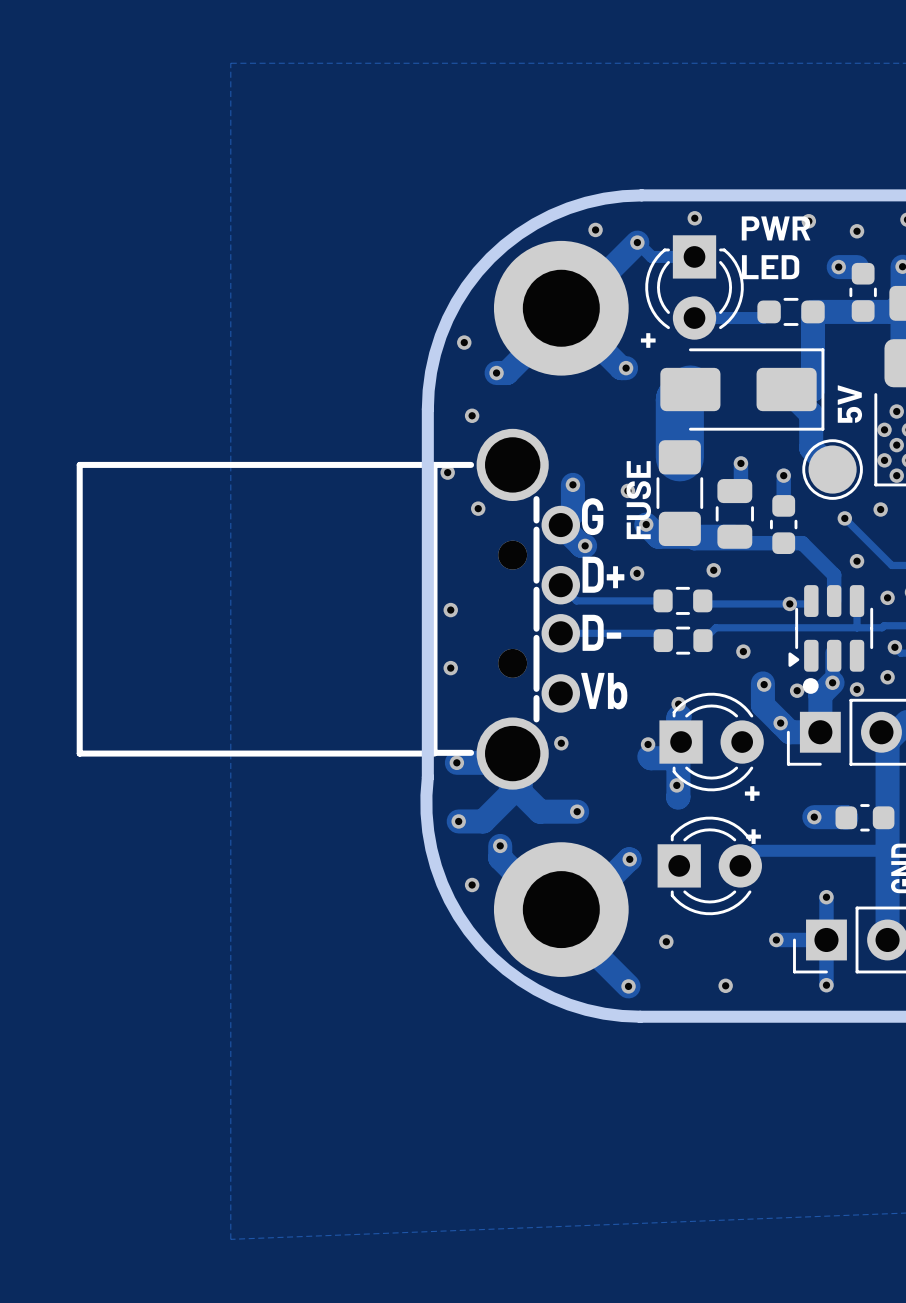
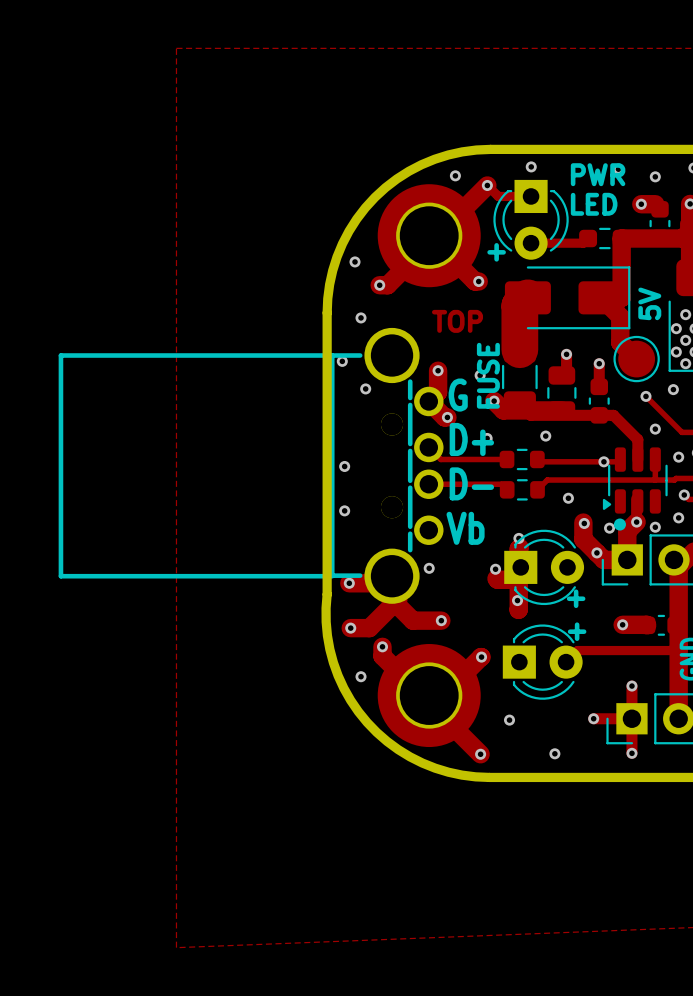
text: none -> TOP (457, 321)

